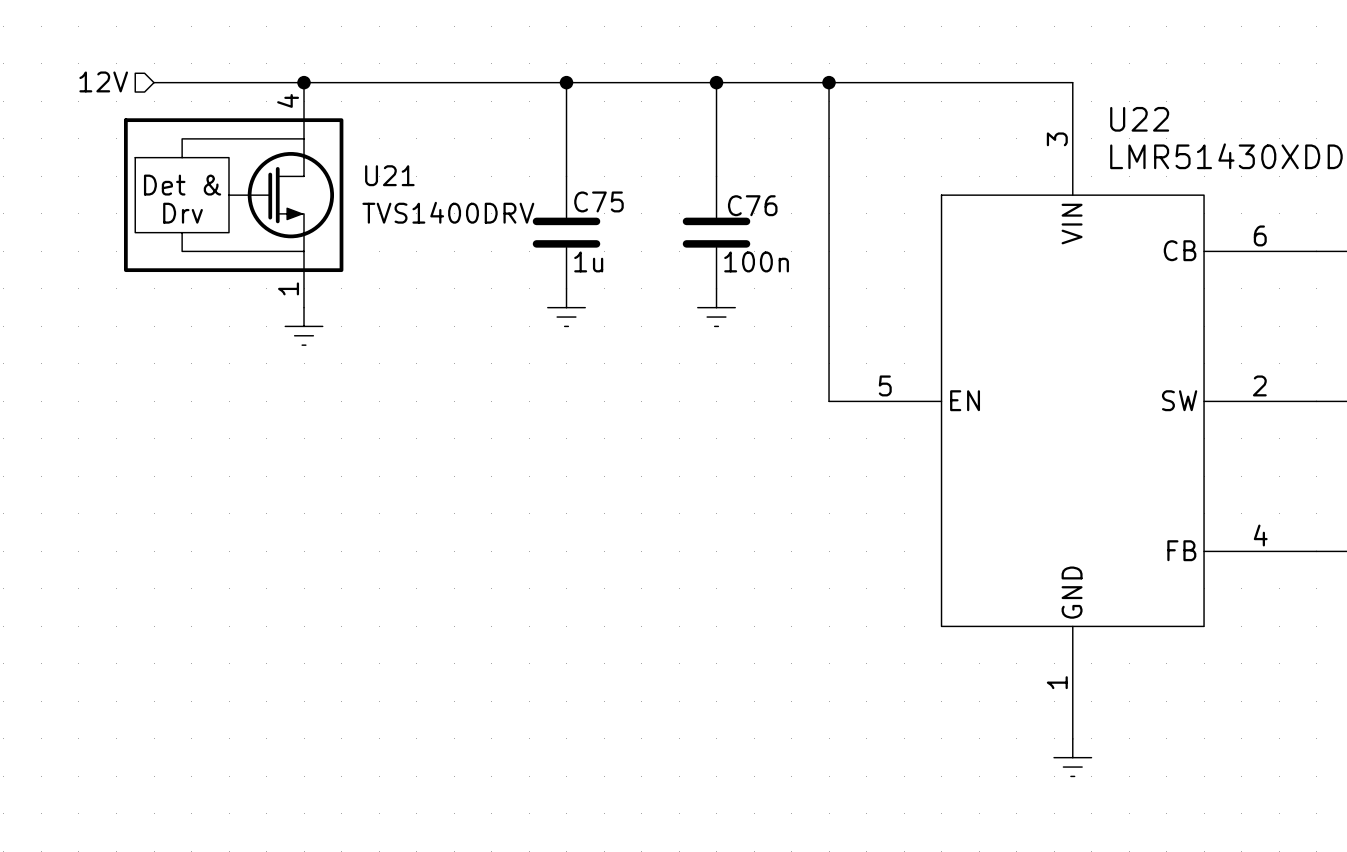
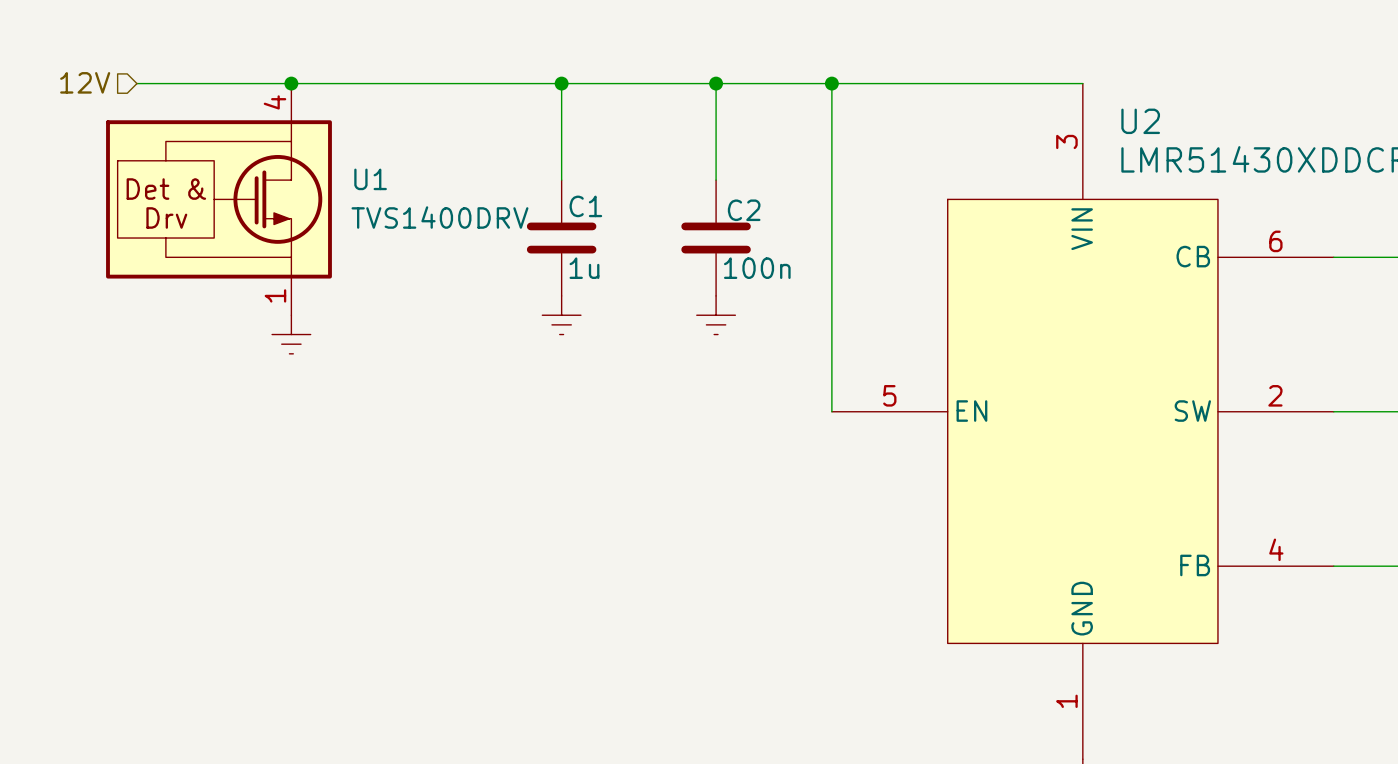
U22 name: U22 (1139, 119) -> U2 (1140, 121)
U21 name: U21 (389, 175) -> U1 (370, 179)
C75 name: C75 (598, 201) -> C1 (585, 206)
C76 name: C76 (752, 205) -> C2 (744, 210)

